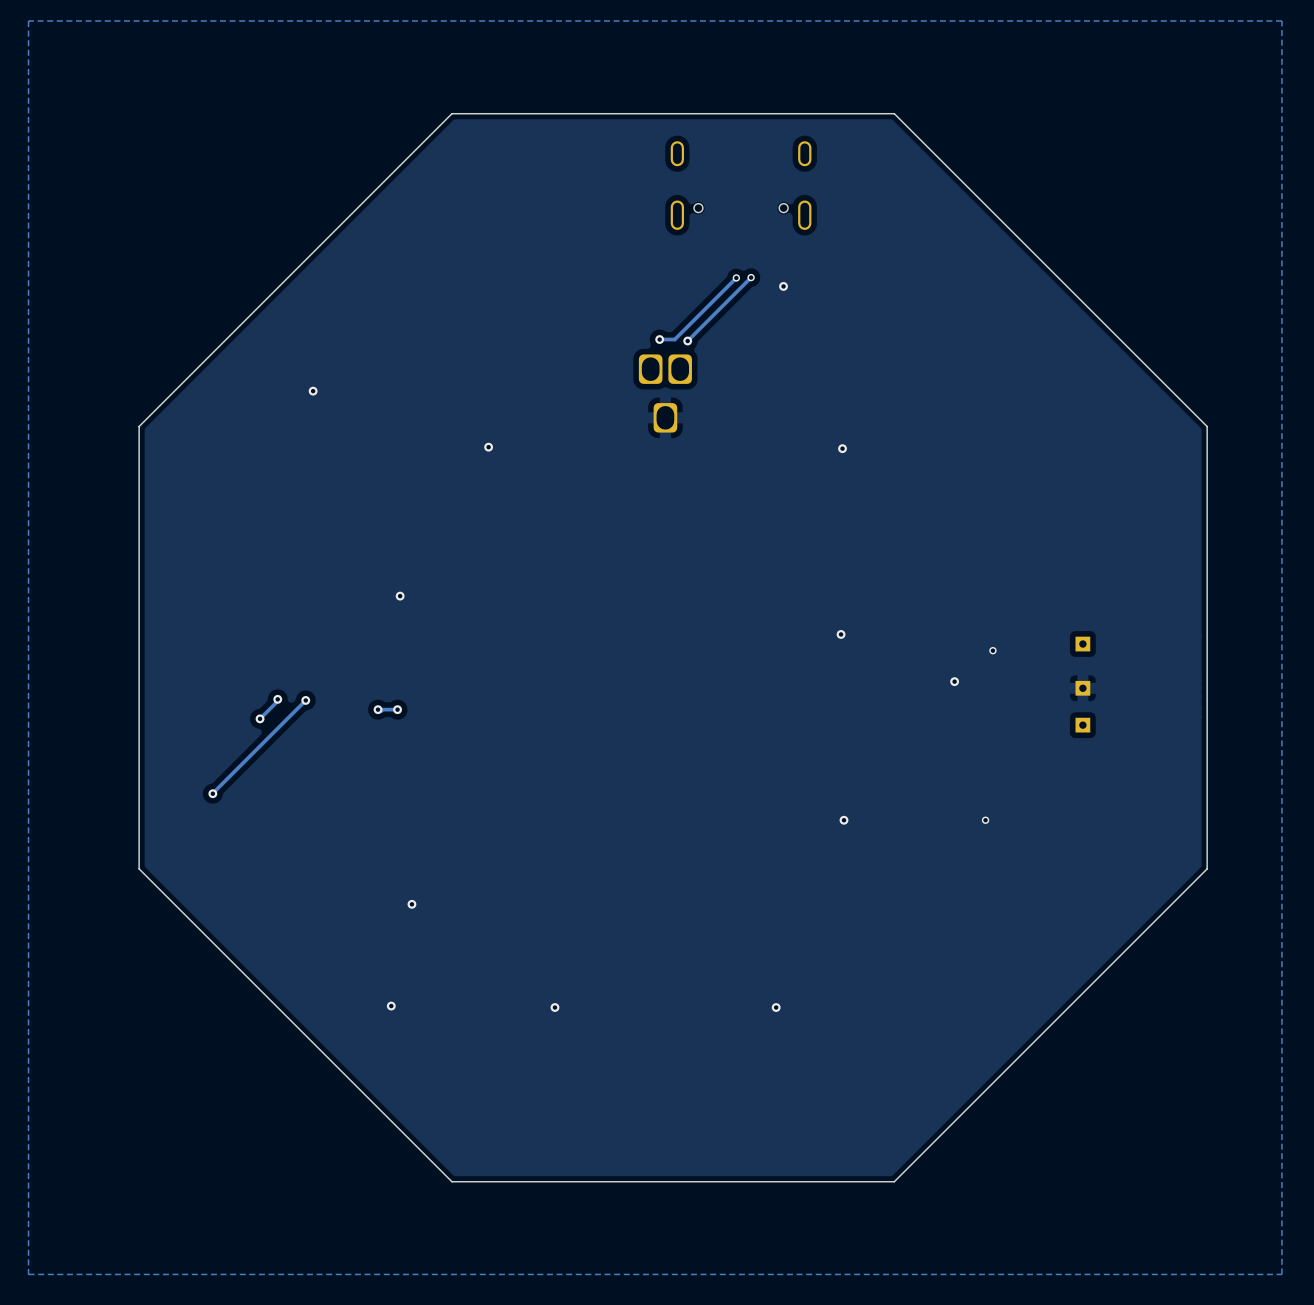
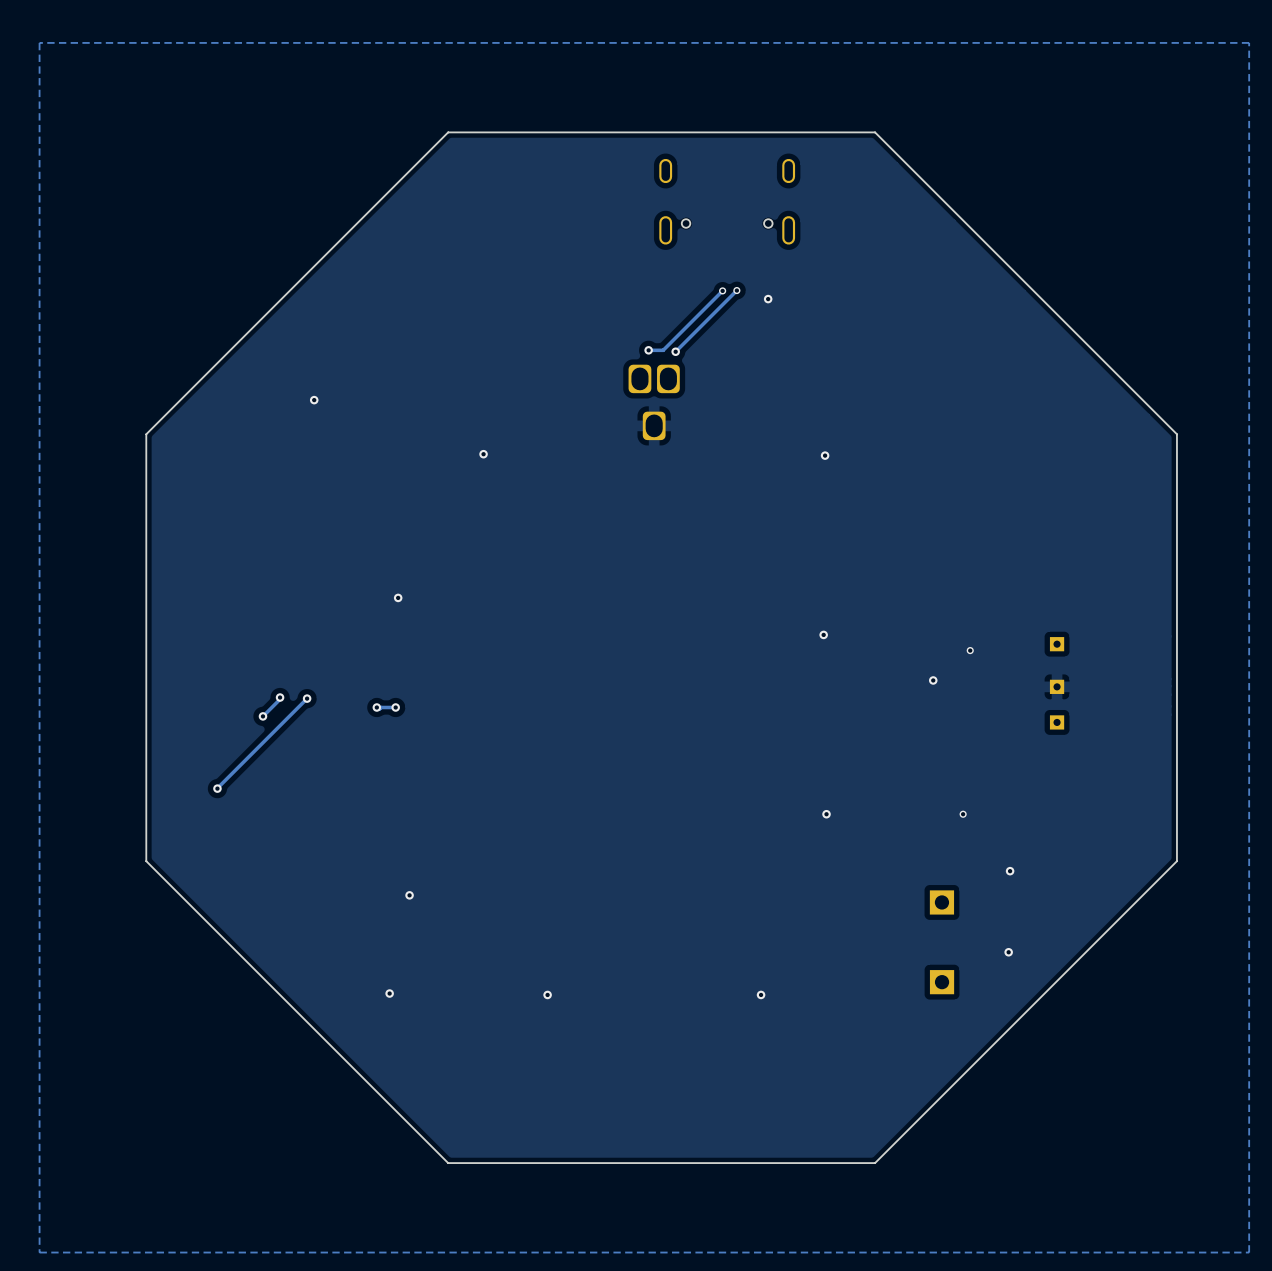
via: none -> (1010, 871)
part: none -> (941, 902)
via: none -> (1008, 952)
part: none -> (942, 982)

